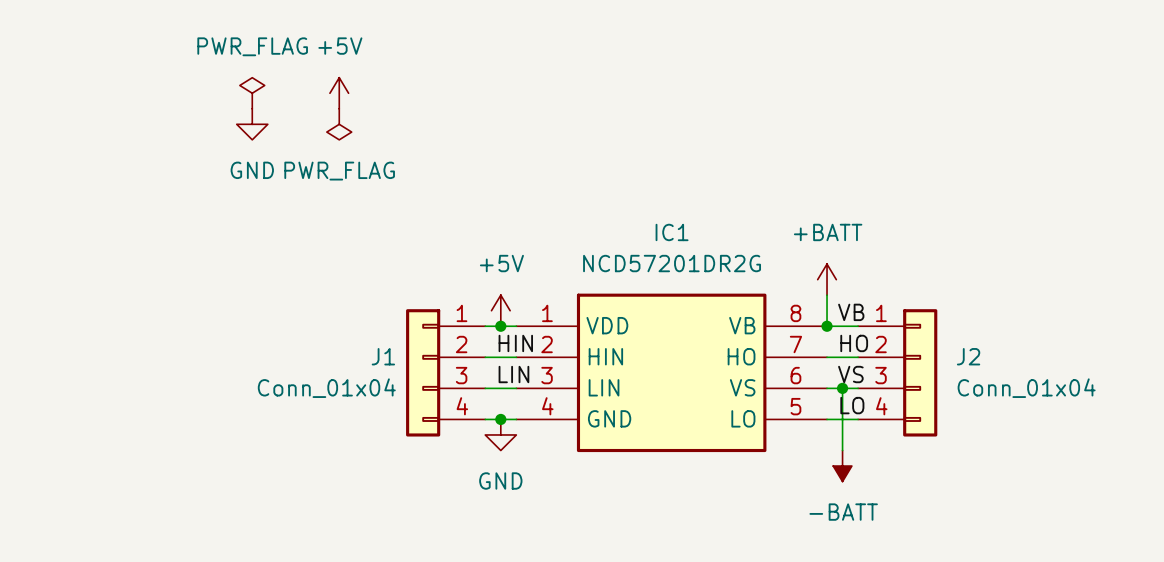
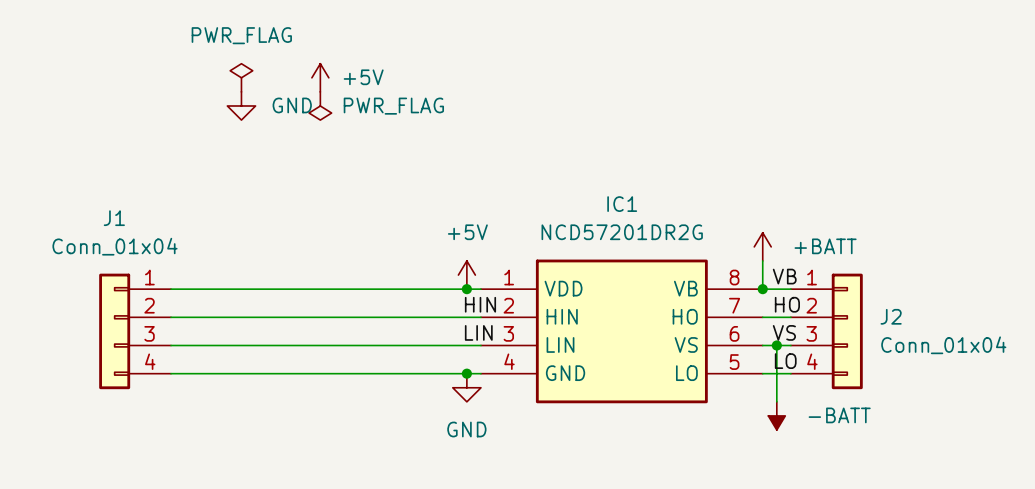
power symbol text position: +5V (340, 46) -> +5V (363, 77)
power symbol text position: GND (252, 170) -> GND (292, 105)
power symbol text position: PWR_FLAG (339, 171) -> PWR_FLAG (393, 106)
power symbol text position: +BATT (828, 232) -> +BATT (825, 246)
wire: none -> (171, 289) (452, 289)
J1 name position: J1 (383, 356) -> J1 (114, 218)
wire: none -> (171, 317) (452, 317)
J1 position: (445, 372) -> (135, 331)
wire: none -> (171, 345) (452, 345)
J1 value position: Conn_01x04 (326, 388) -> Conn_01x04 (115, 246)
wire: none -> (171, 373) (452, 373)
power symbol text position: -BATT (843, 512) -> -BATT (839, 415)

